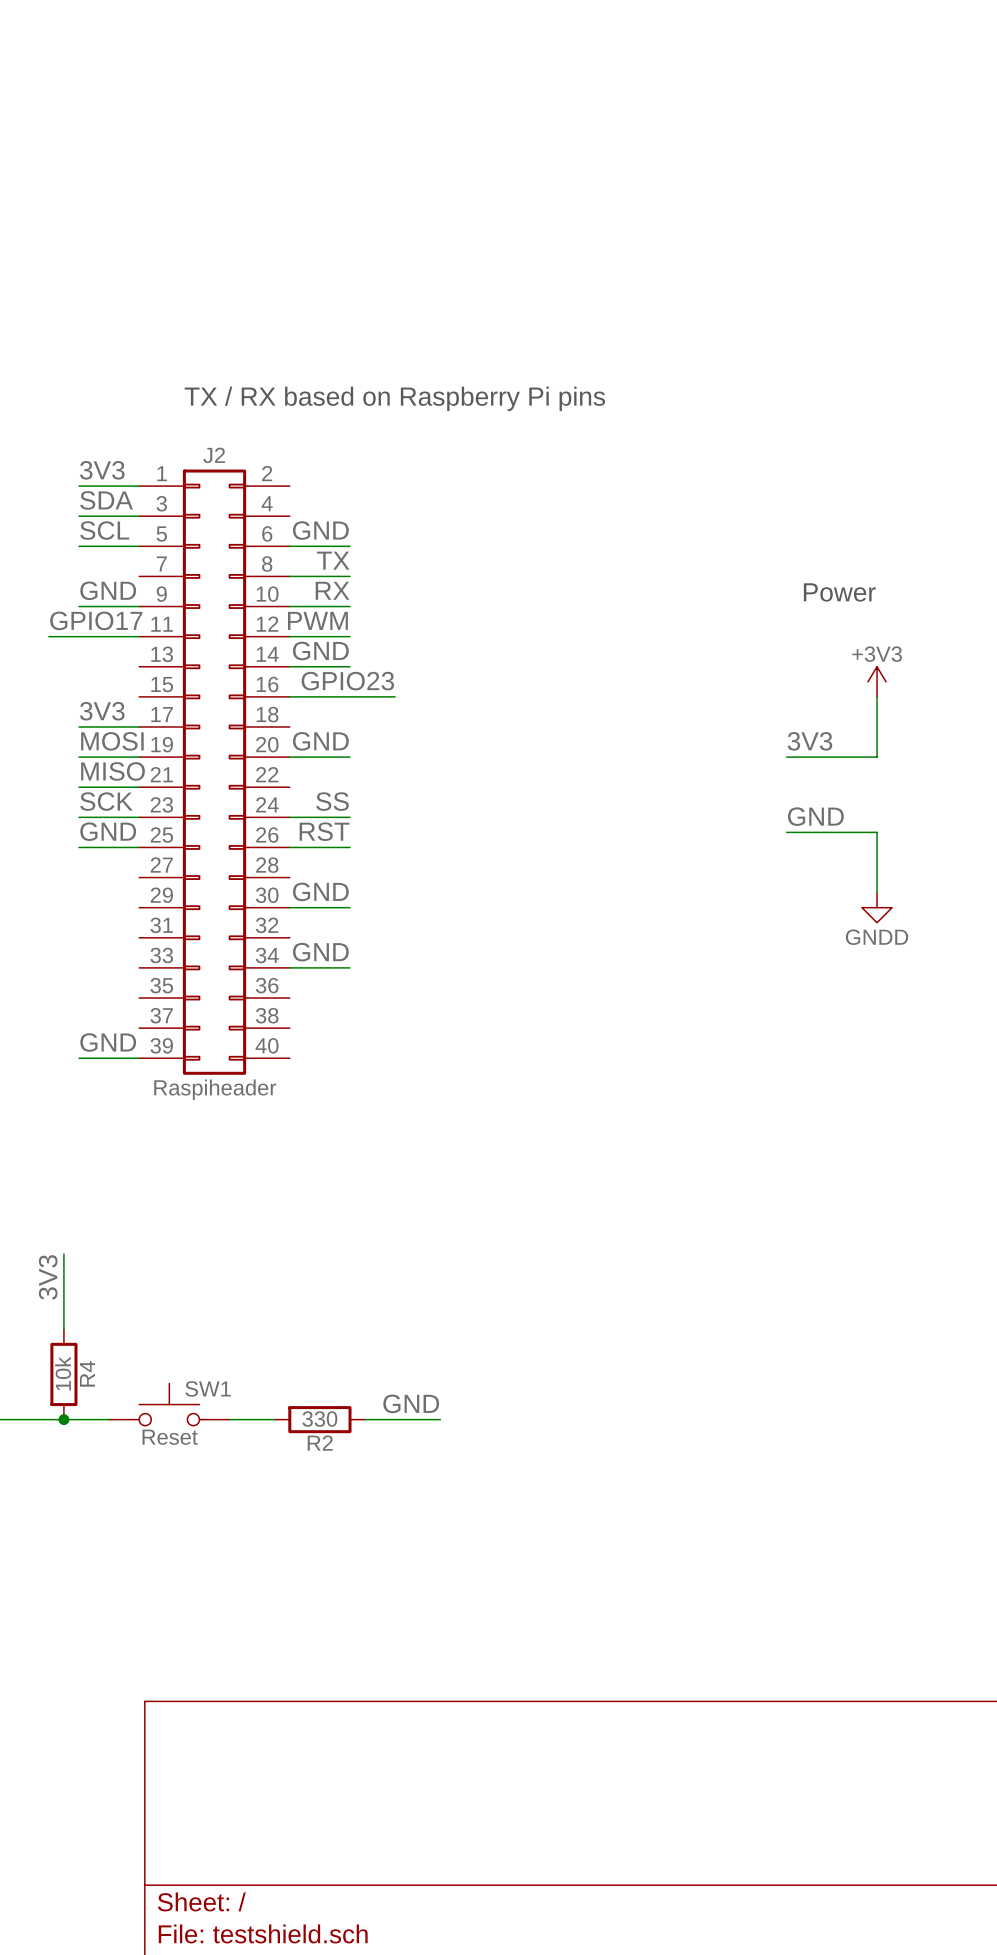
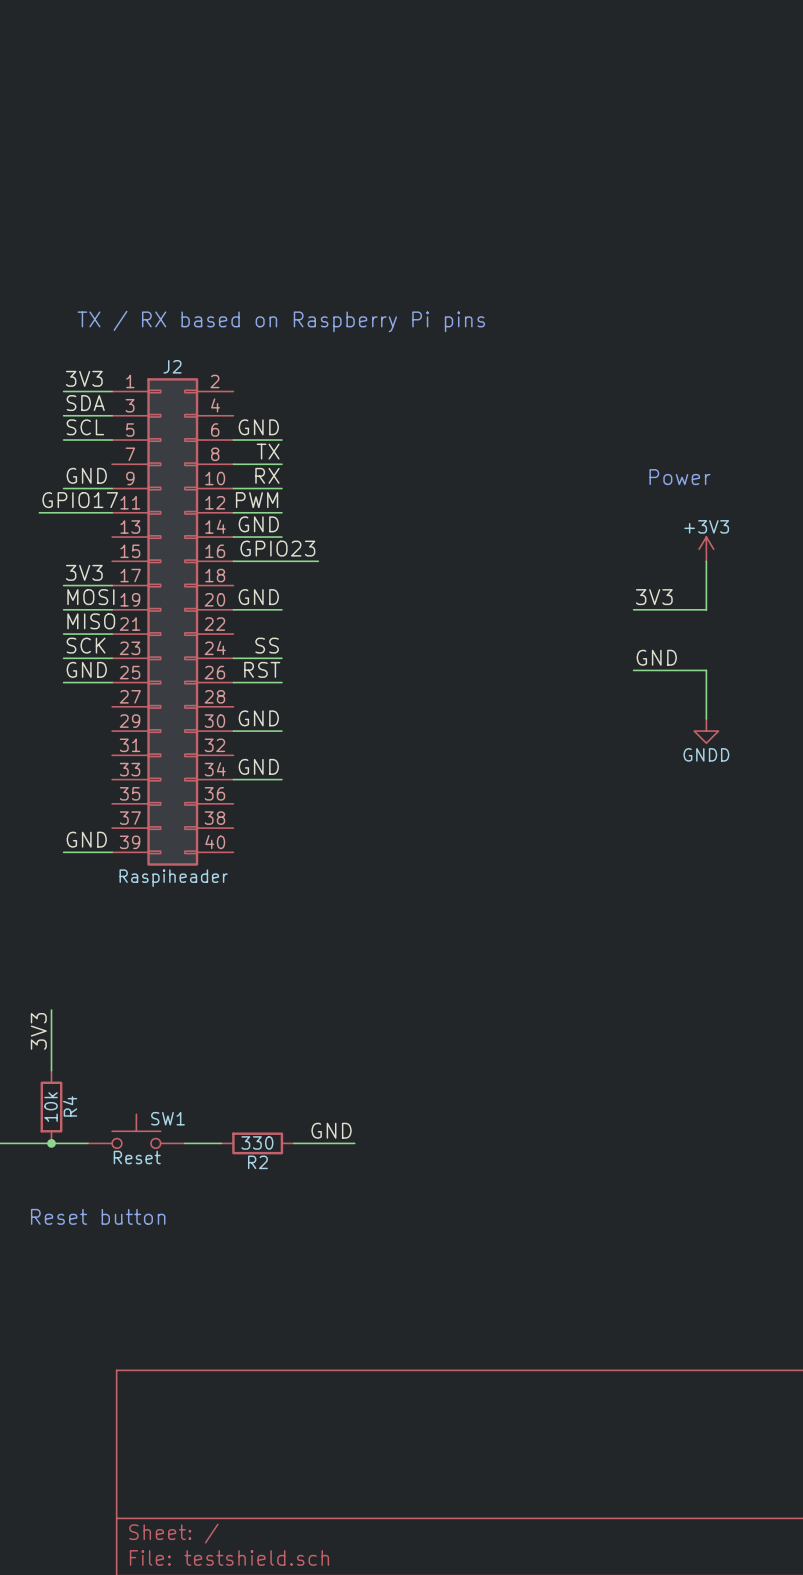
text: none -> Reset button (98, 1216)

